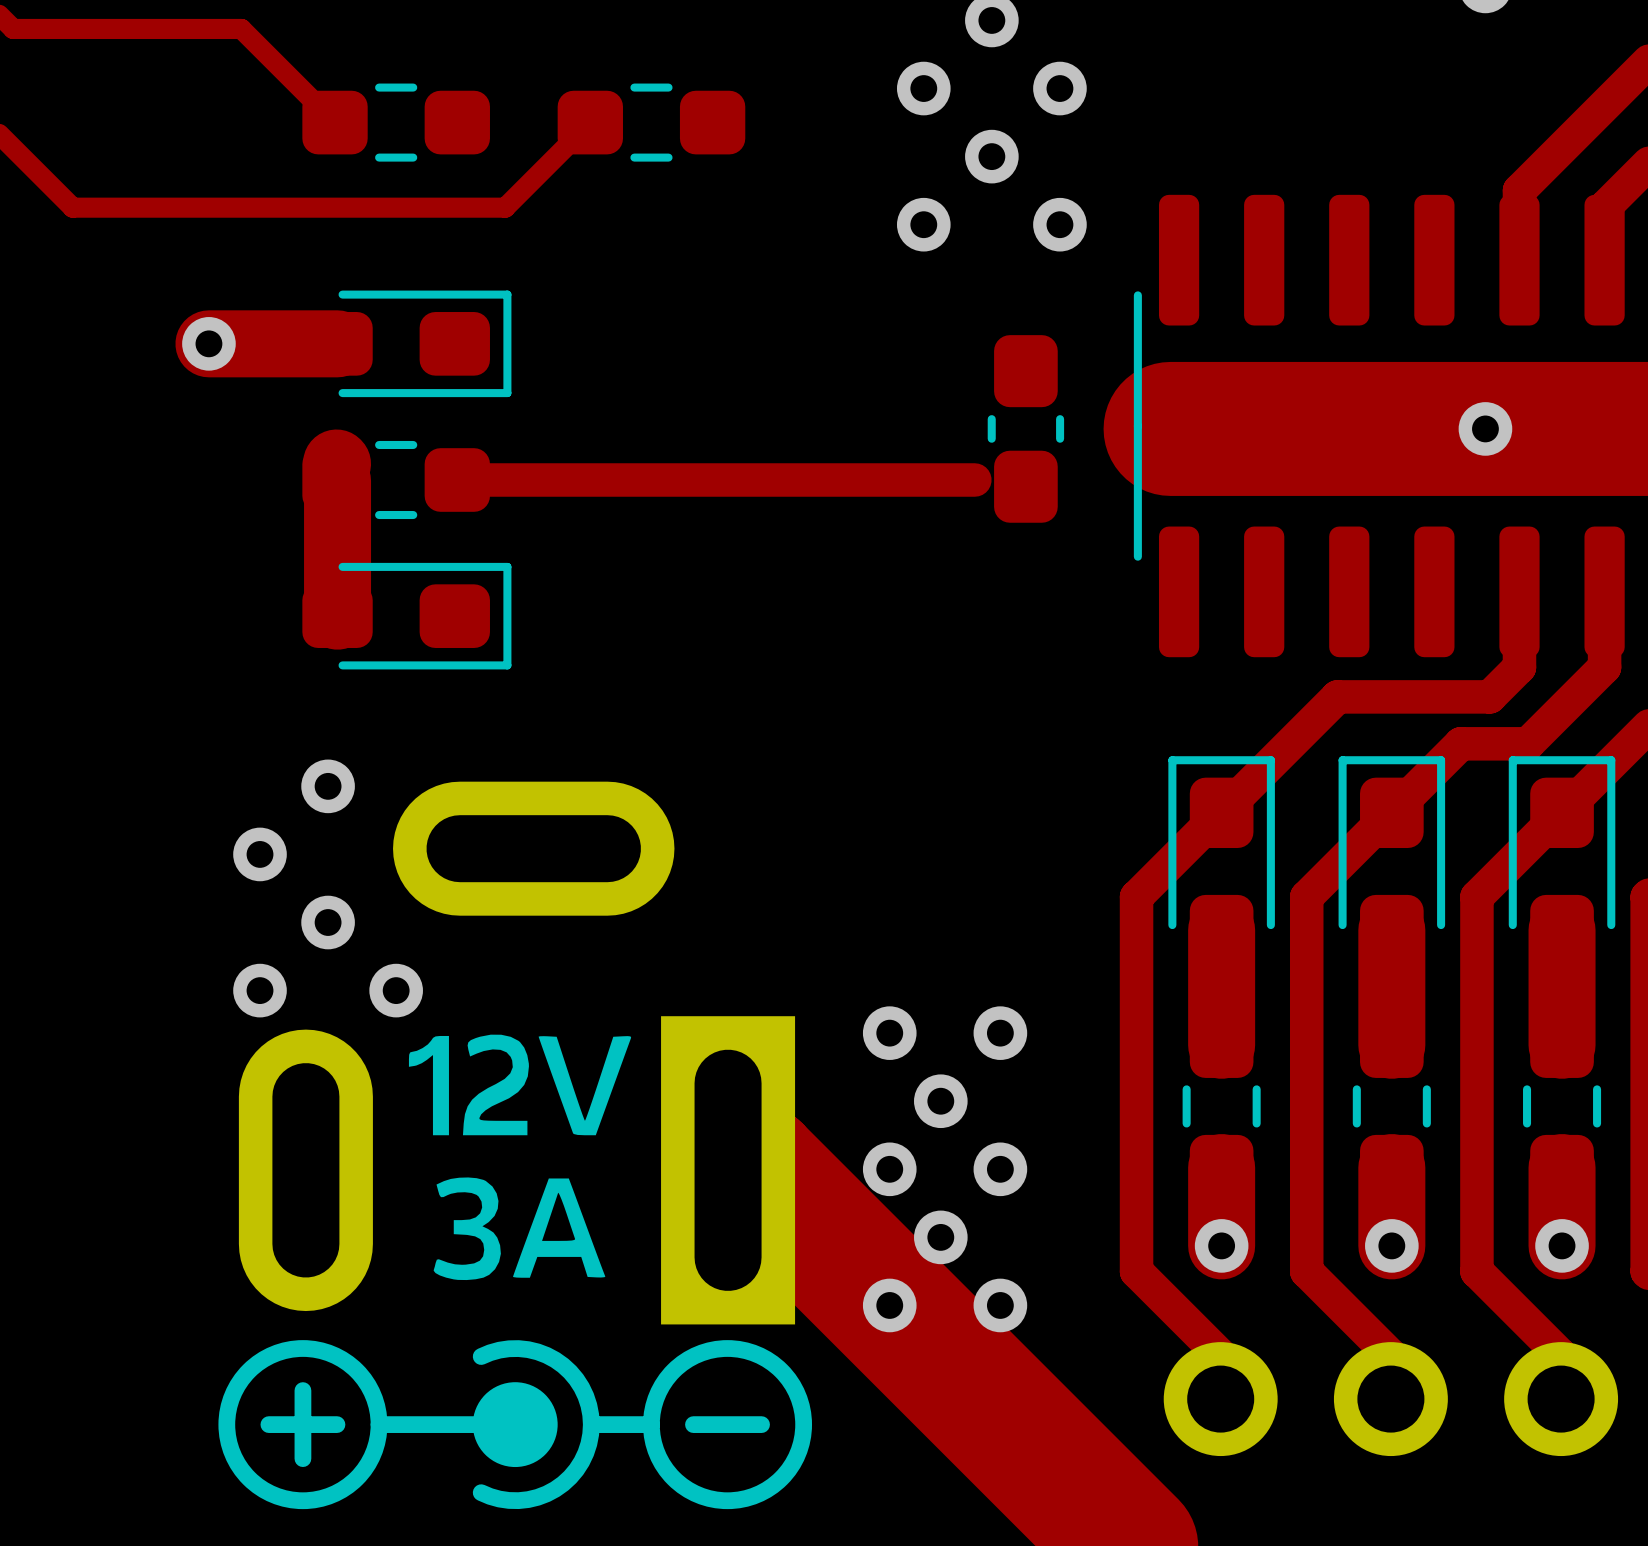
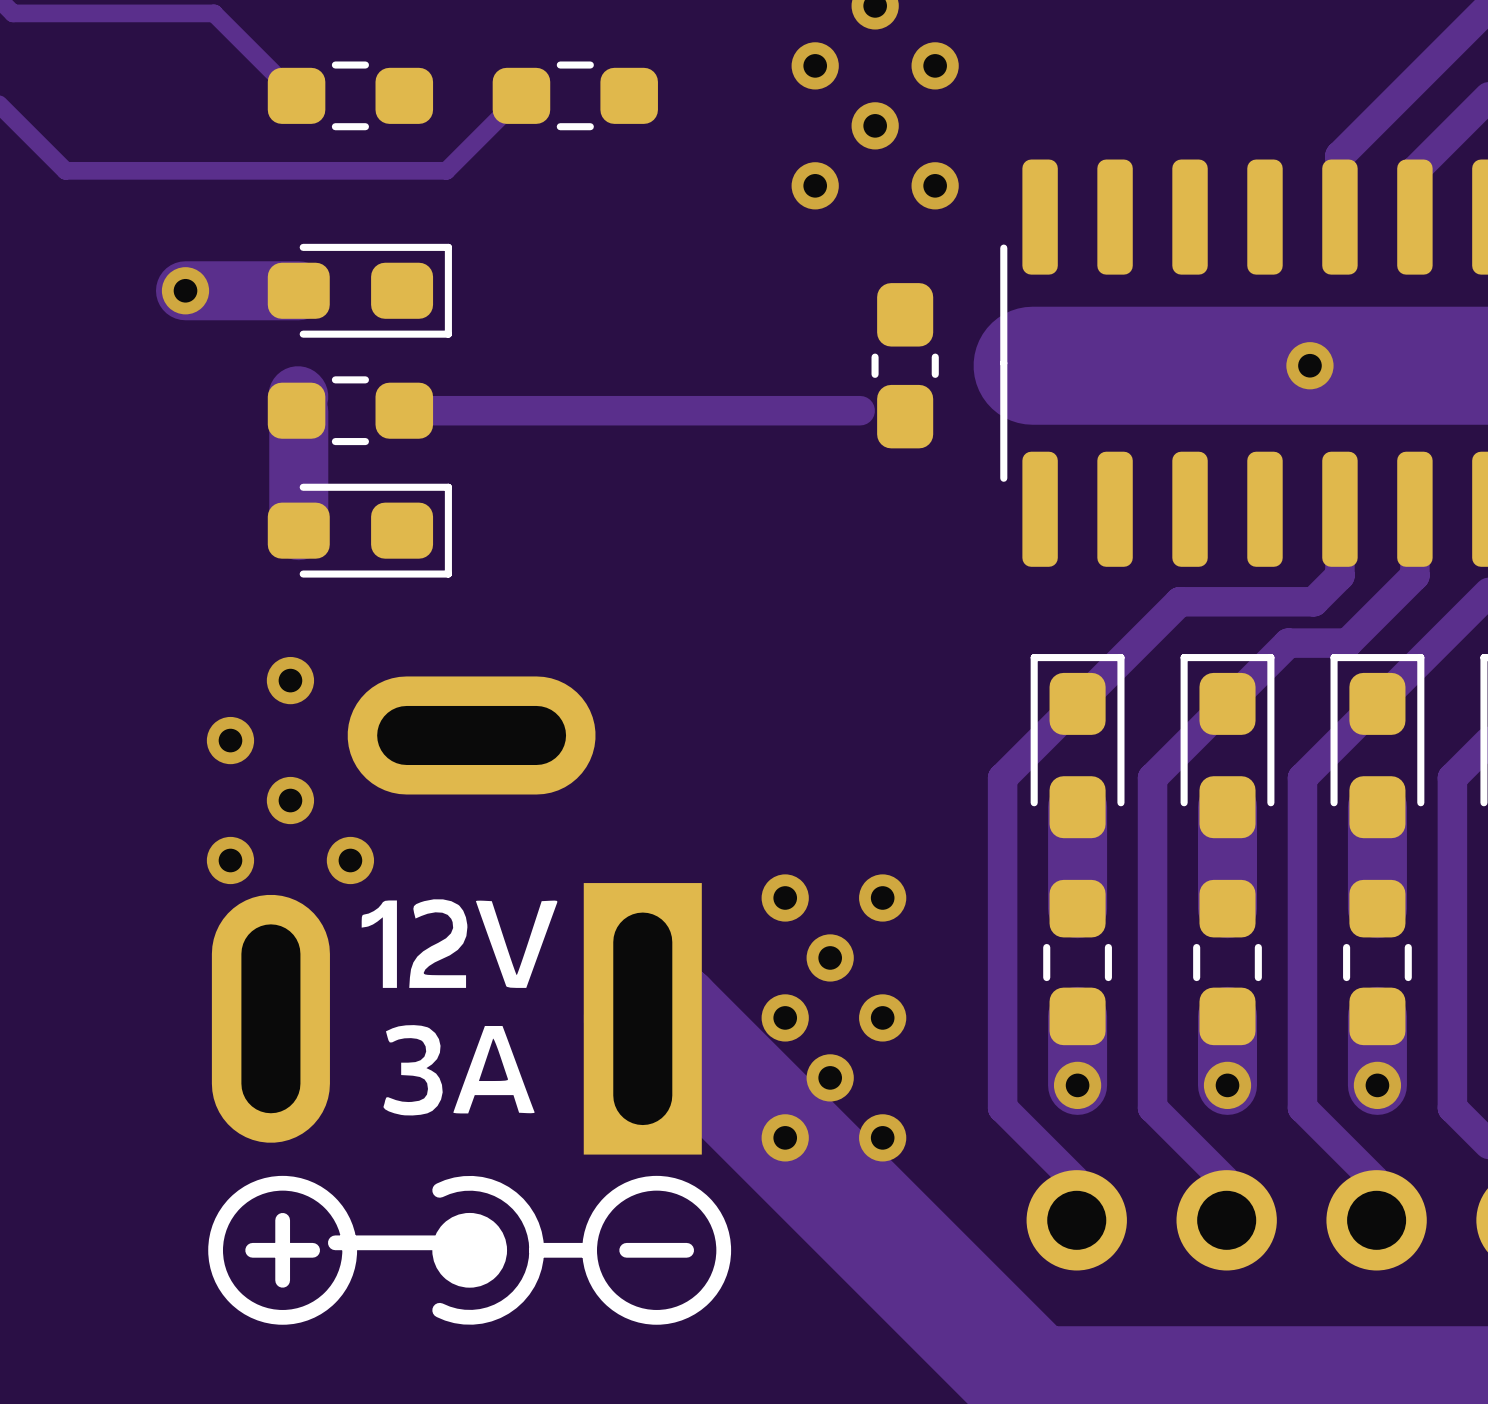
line: (481, 1356) (499, 1350) (518, 1348) (537, 1351) (555, 1359) (570, 1372) (581, 1387) (588, 1405) (591, 1424) (588, 1443) (581, 1461) (570, 1477) (555, 1489) (537, 1497) (518, 1500) (499, 1499) (481, 1492) -> (439, 1190) (455, 1184) (472, 1183) (489, 1186) (504, 1193) (518, 1203) (528, 1217) (534, 1233) (536, 1250) (534, 1267) (528, 1282) (518, 1296) (504, 1307) (489, 1314) (472, 1317) (455, 1315) (439, 1310)
line: (302, 1390) (302, 1458) -> (282, 1220) (282, 1280)
line: (268, 1424) (336, 1424) -> (252, 1250) (312, 1250)
drawing position: (302, 1424) -> (282, 1250)
drawing position: (515, 1424) -> (469, 1250)
line: (591, 1424) (651, 1424) -> (536, 1250) (589, 1250)
line: (693, 1424) (761, 1424) -> (626, 1250) (686, 1250)
drawing position: (727, 1424) -> (656, 1250)

